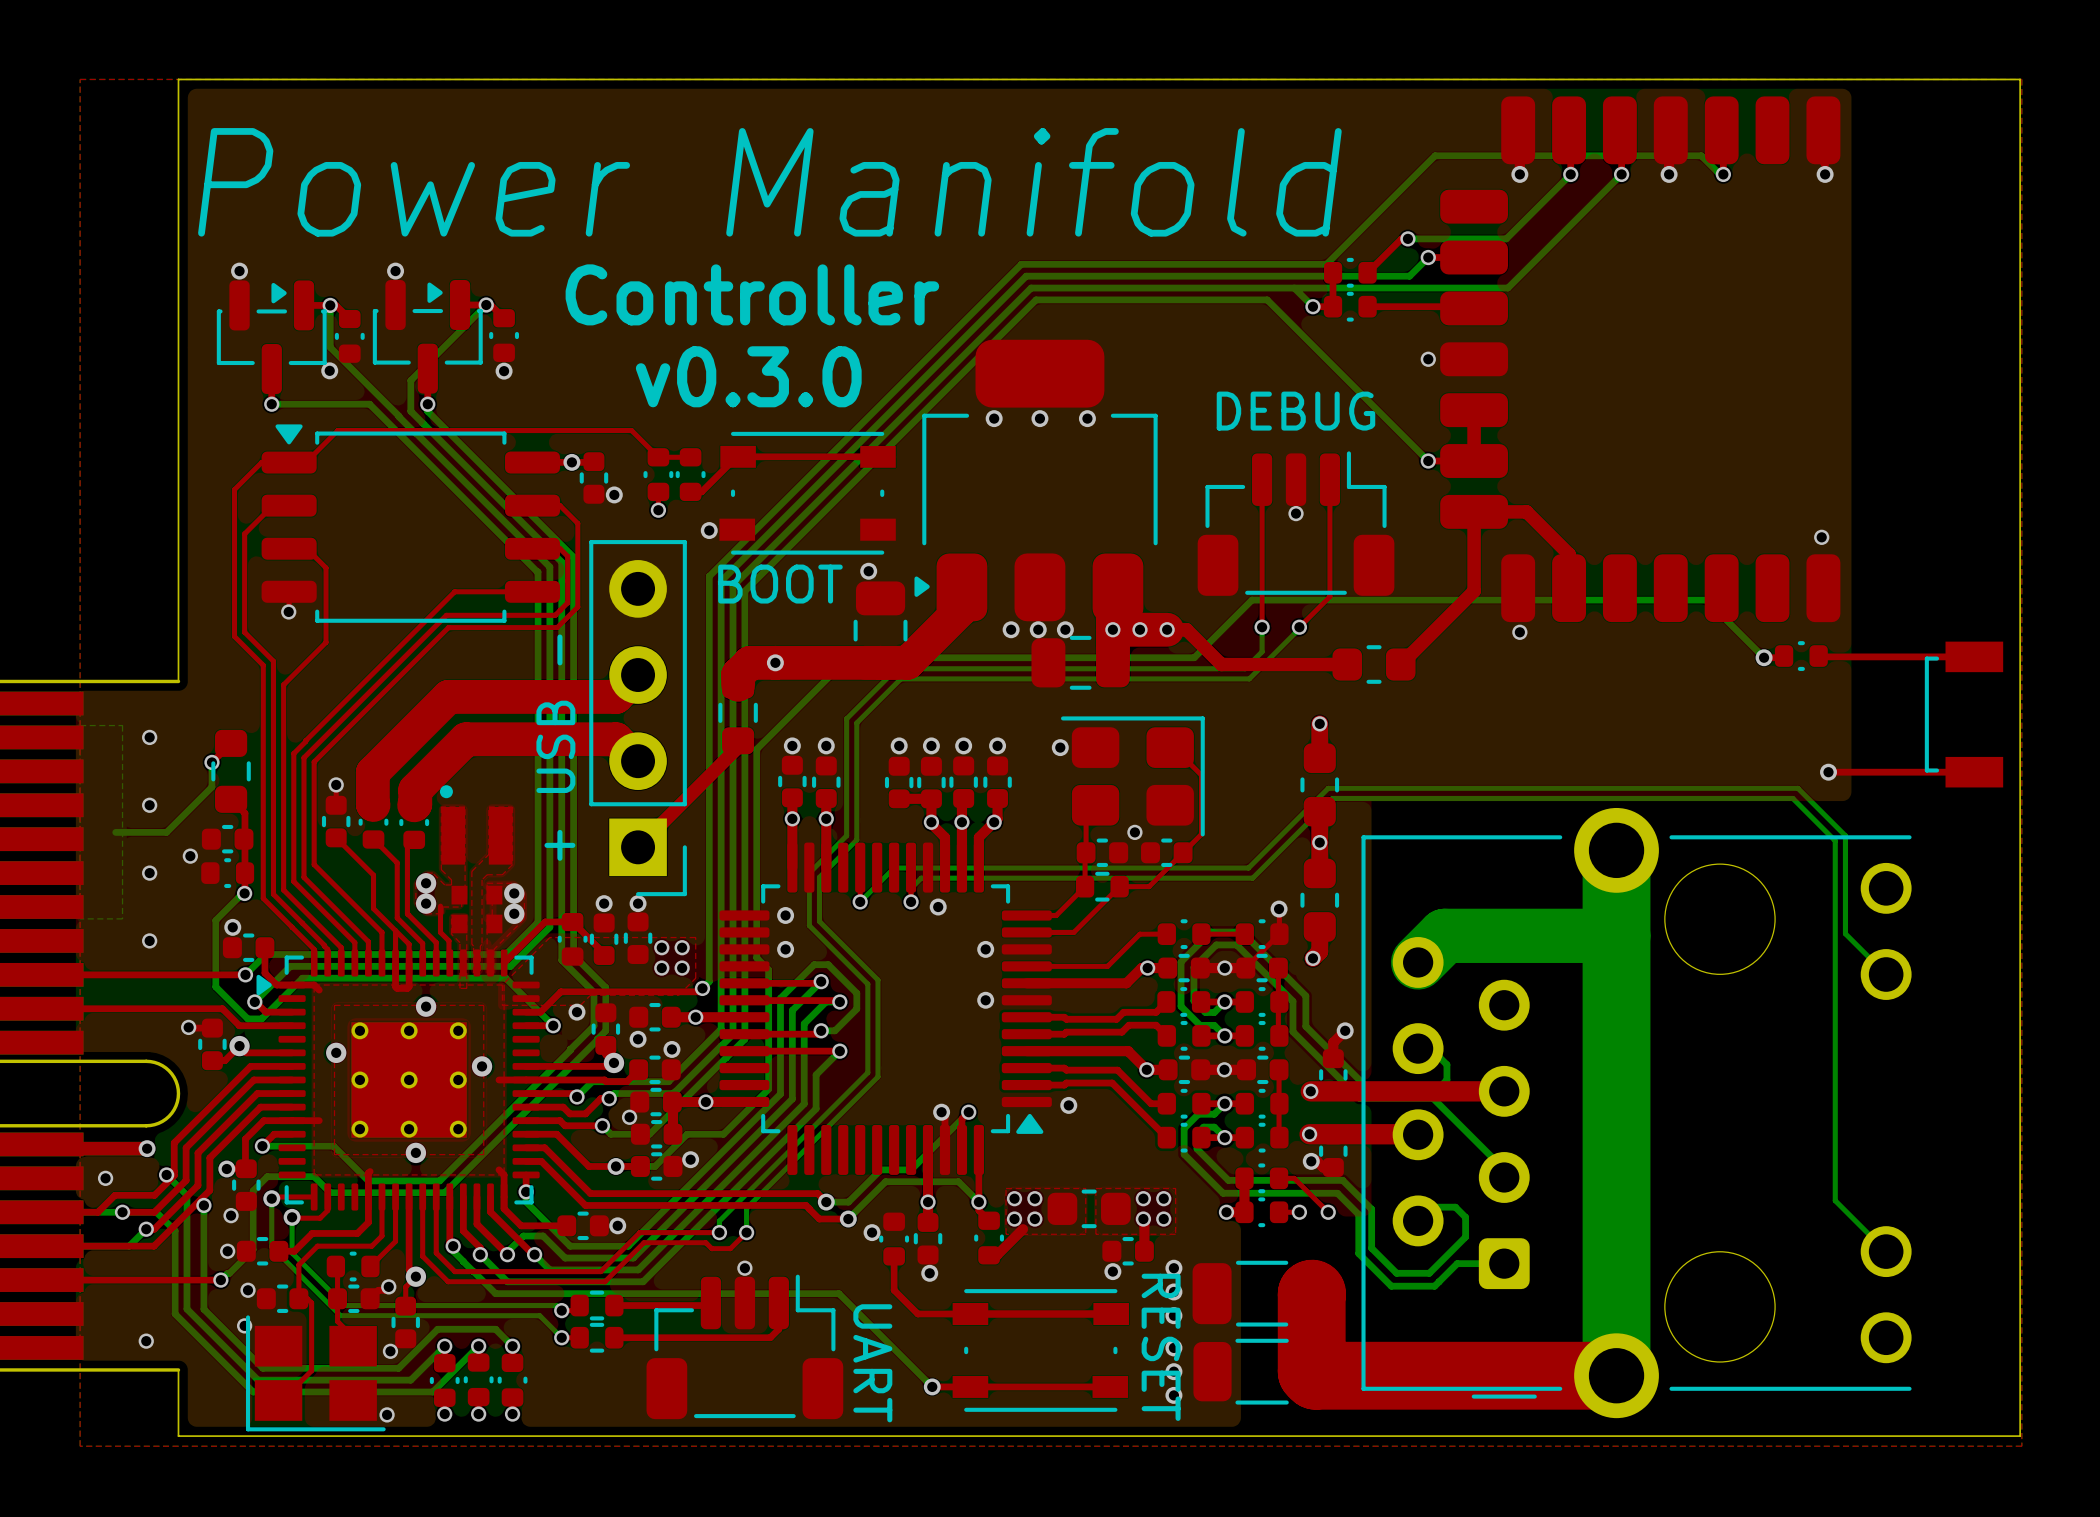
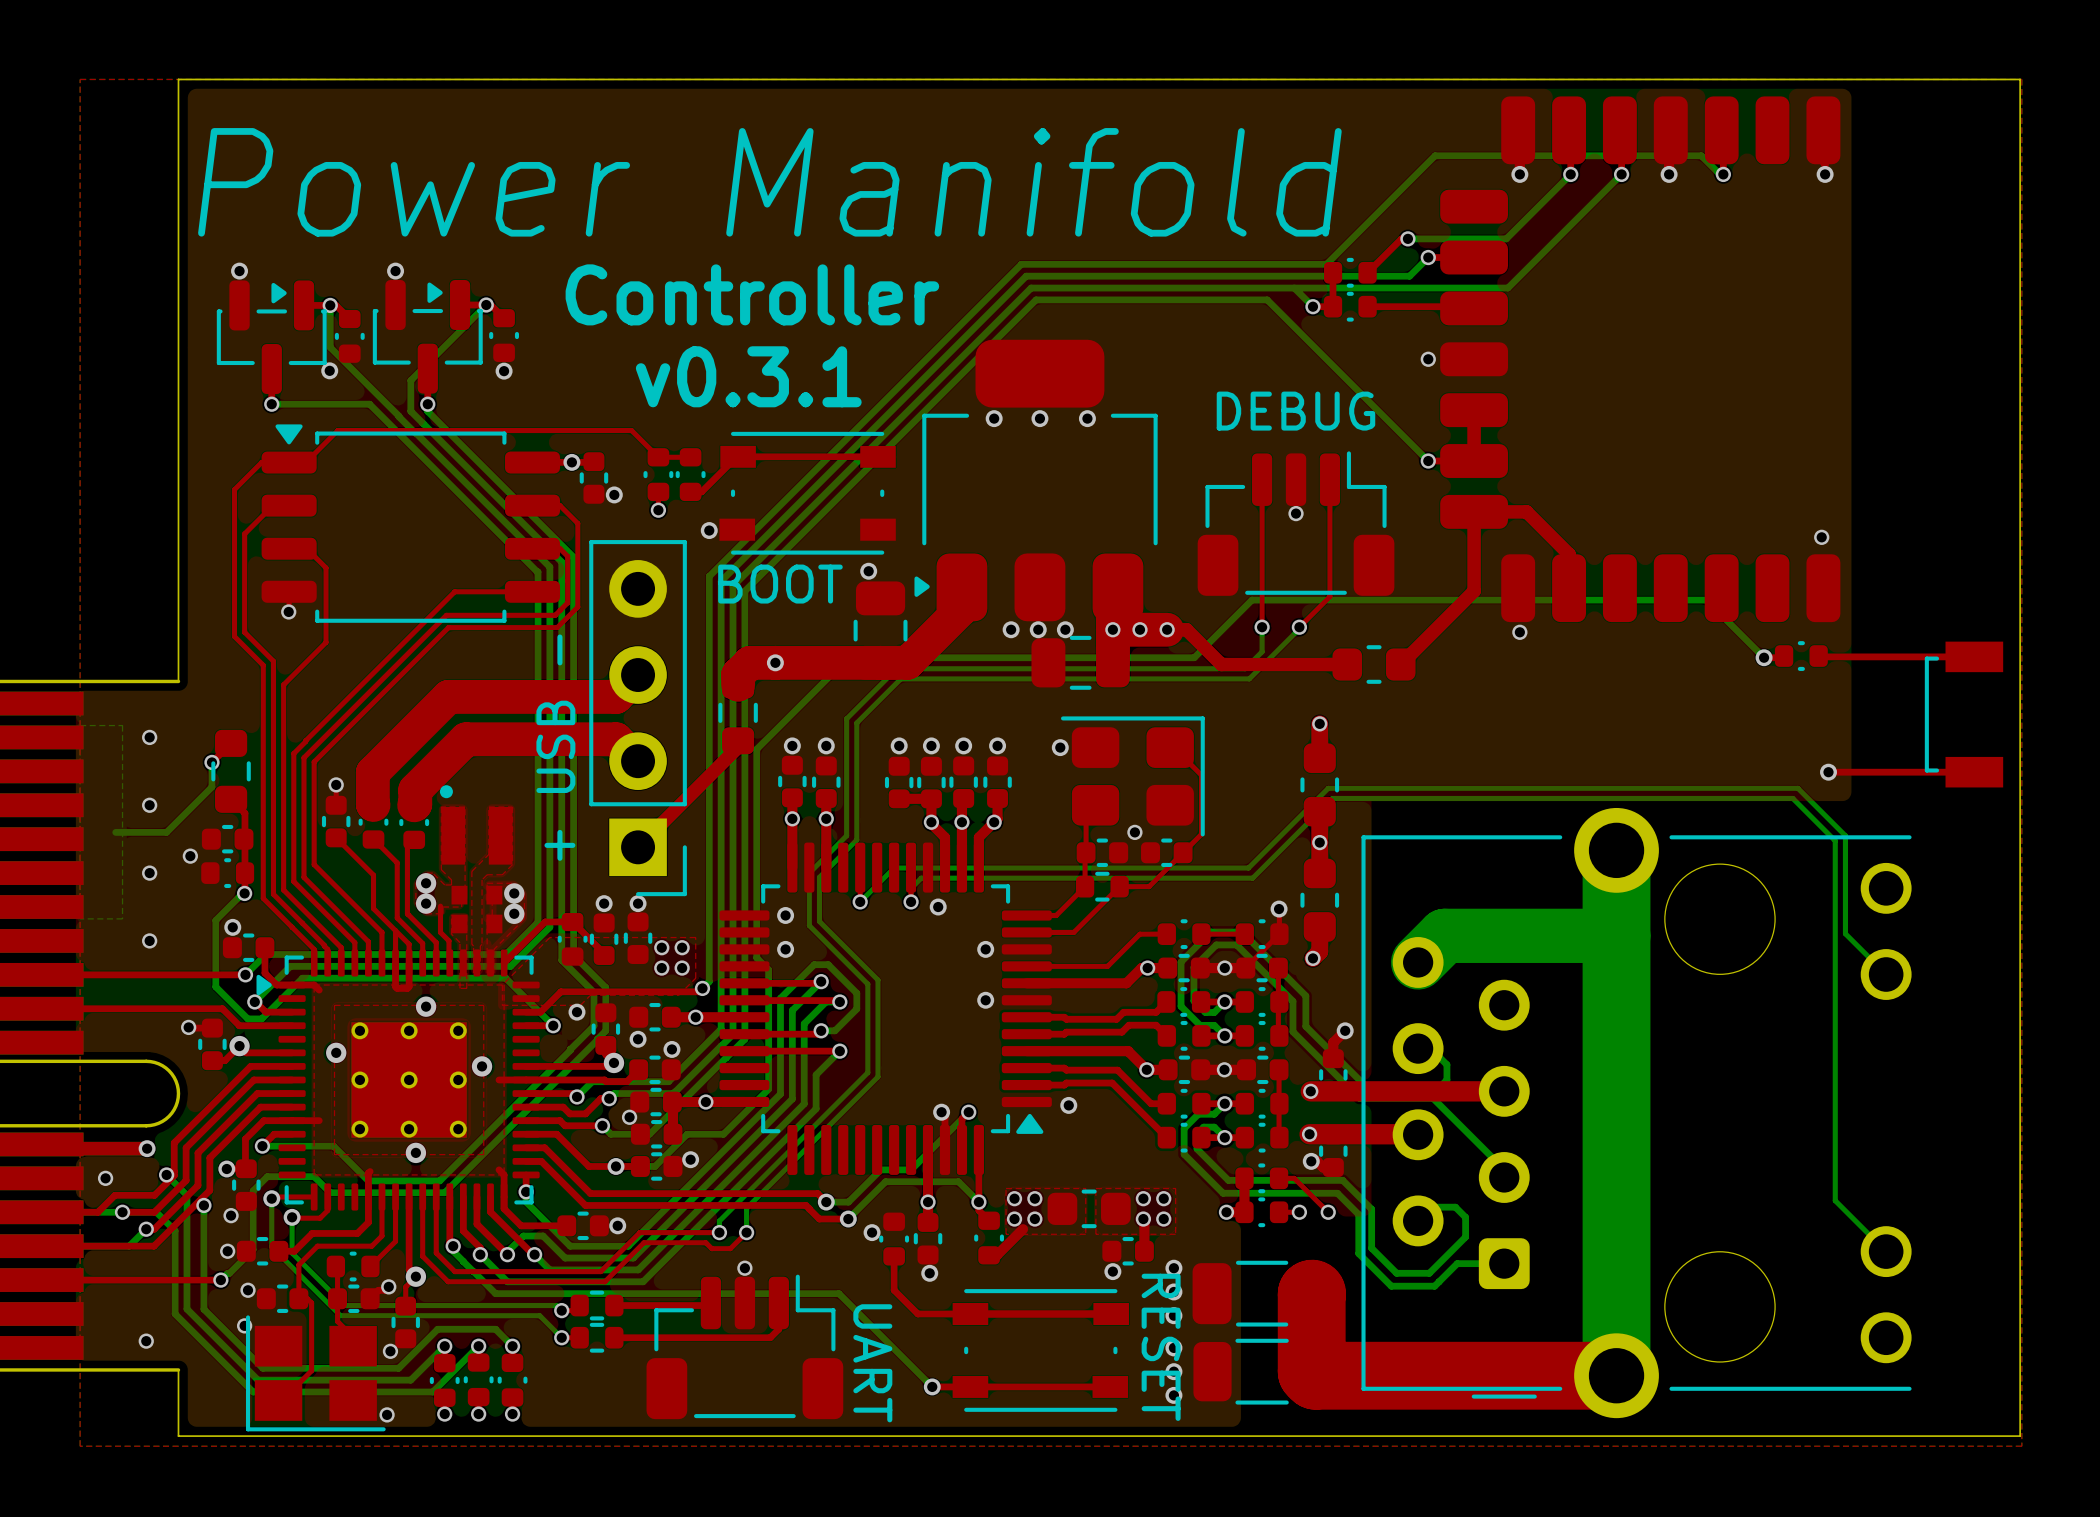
text: v0.3.0 (748, 376) -> v0.3.1 (748, 376)

